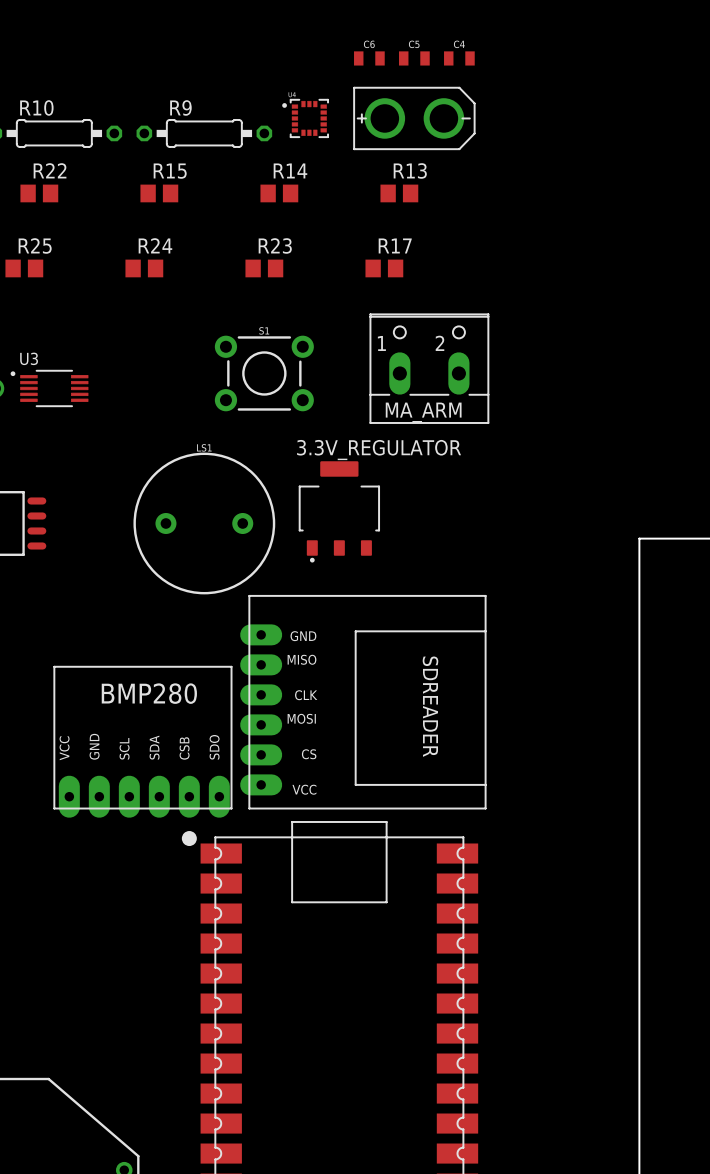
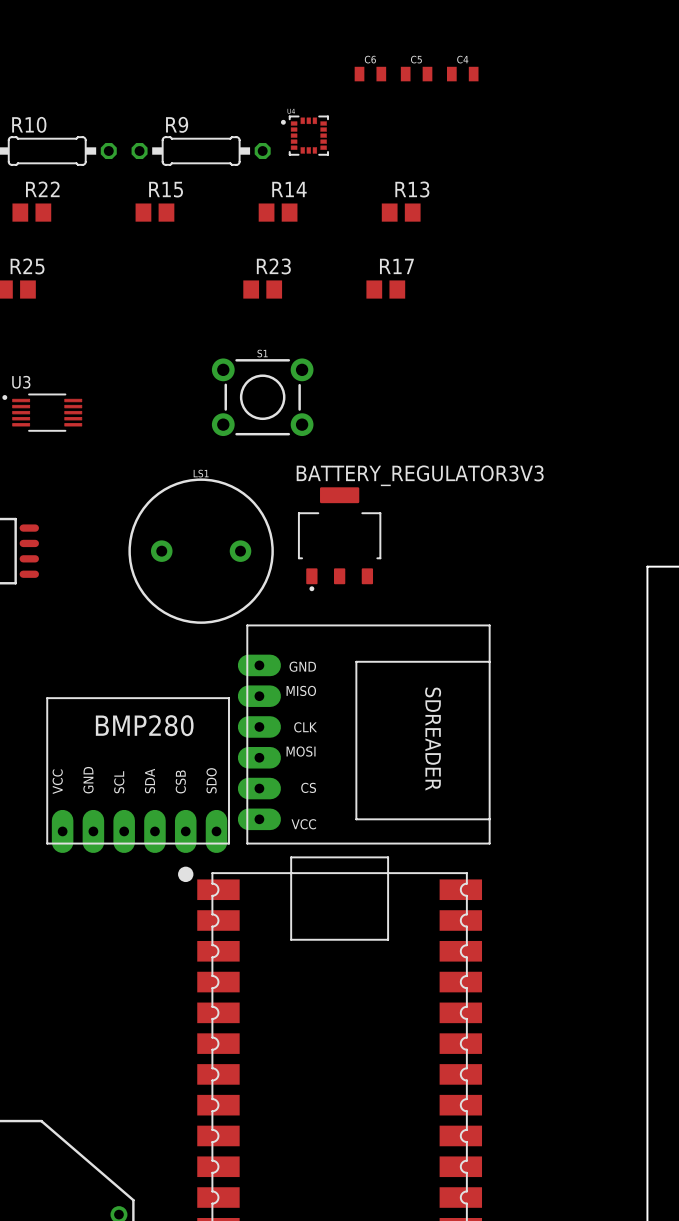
part: (414, 118) -> none
R24: (144, 268) -> none
MA_ARM: (429, 368) -> none
3.3V_REGULATOR name: 3.3V_REGULATOR (379, 450) -> BATTERY_REGULATOR3V3 (420, 475)

